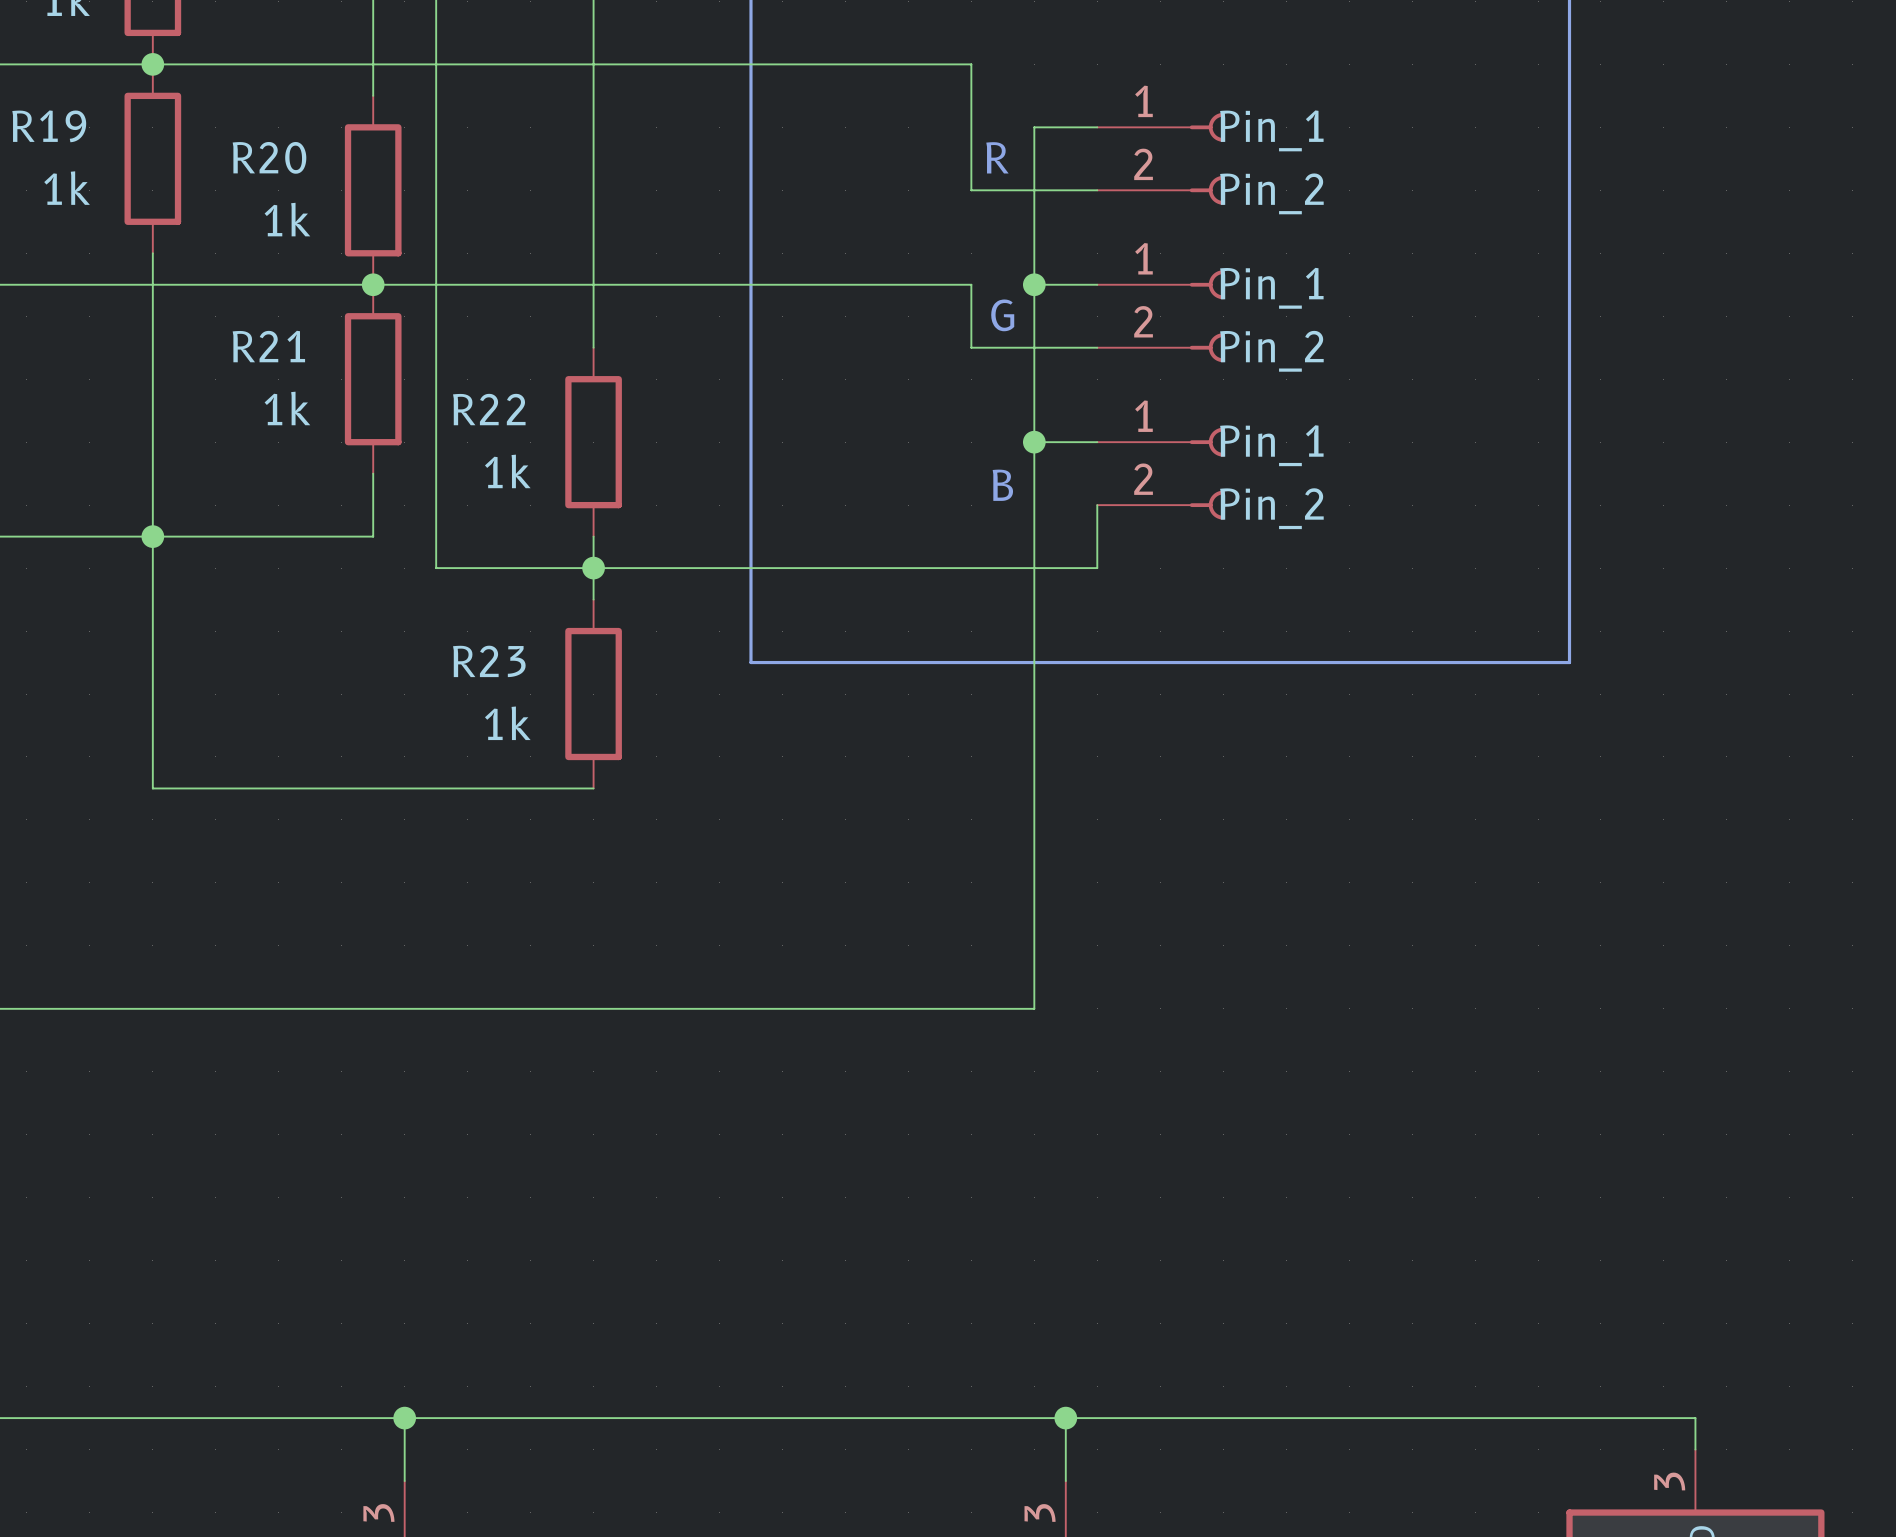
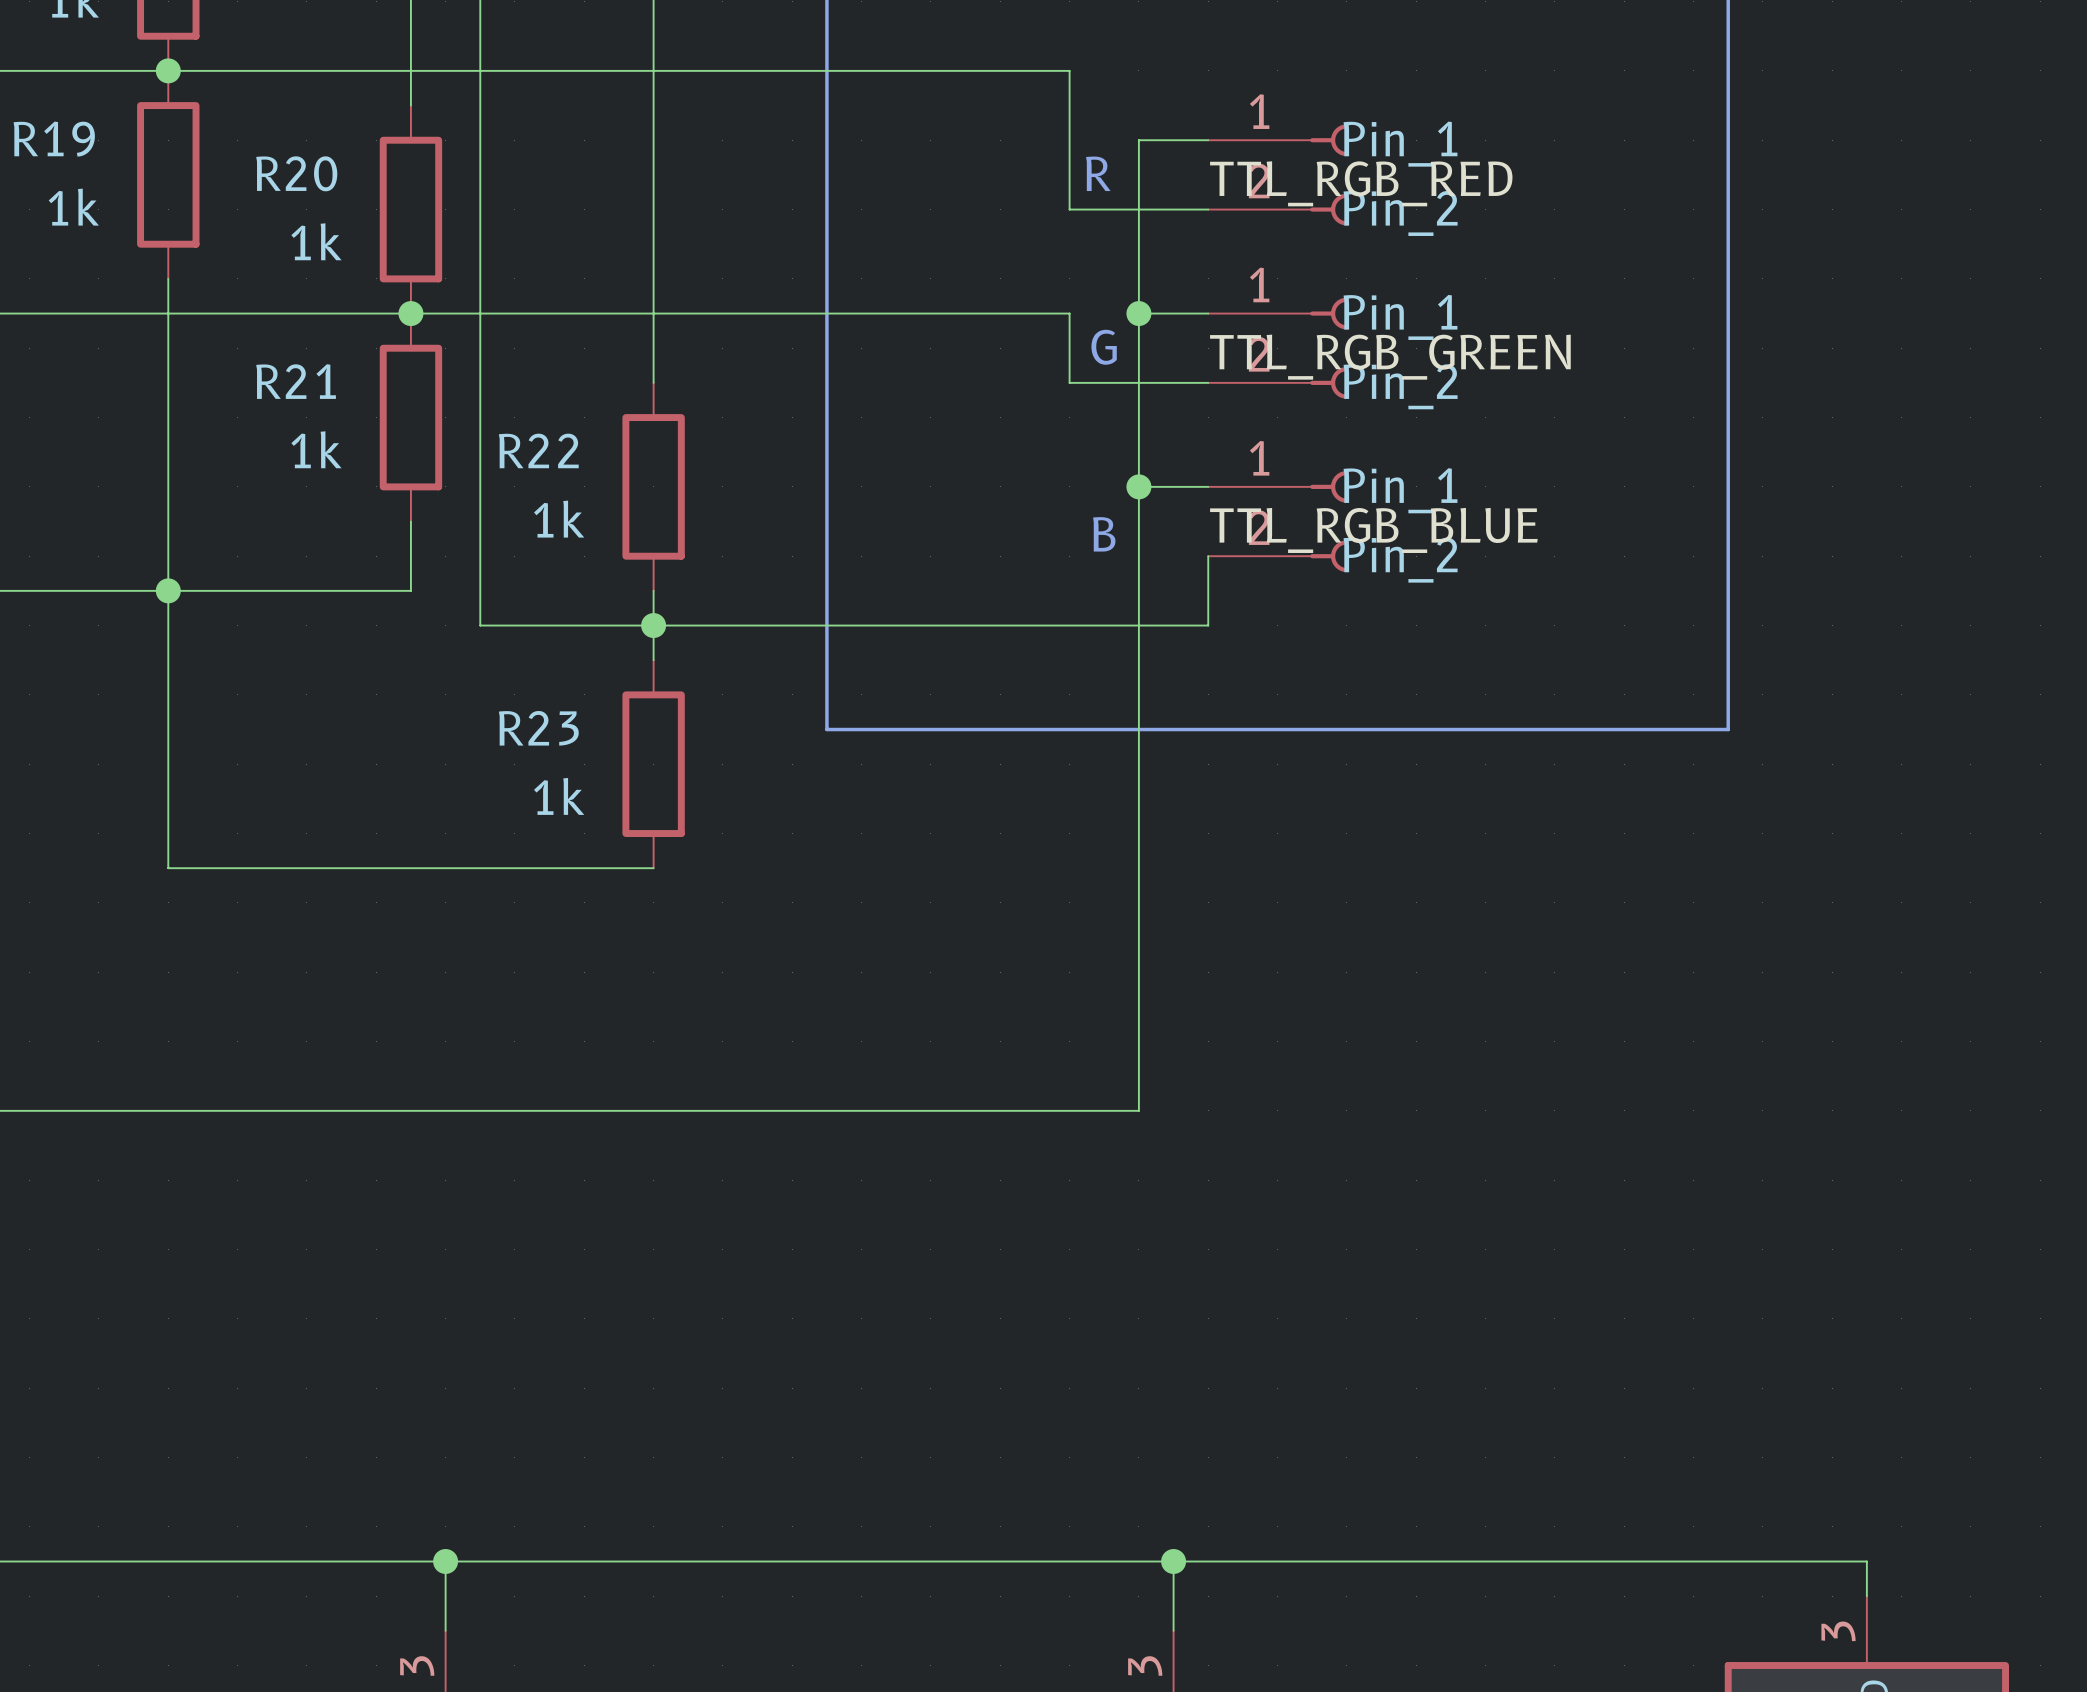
label: none -> TTL_RGB_RED (1361, 183)
label: none -> TTL_RGB_GREEN (1390, 357)
label: none -> TTL_RGB_BLUE (1373, 530)

